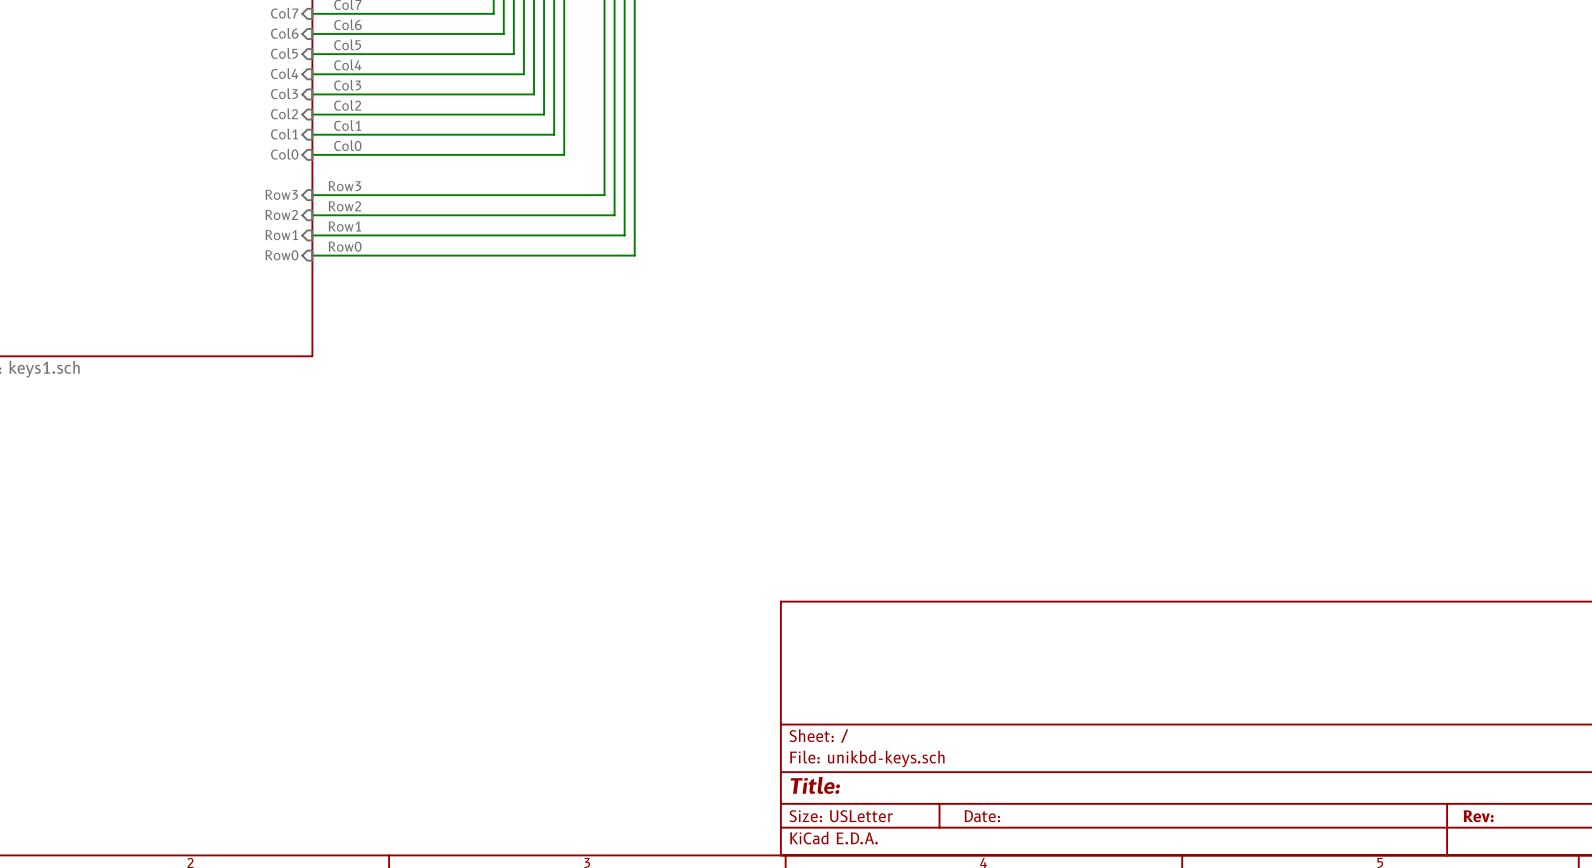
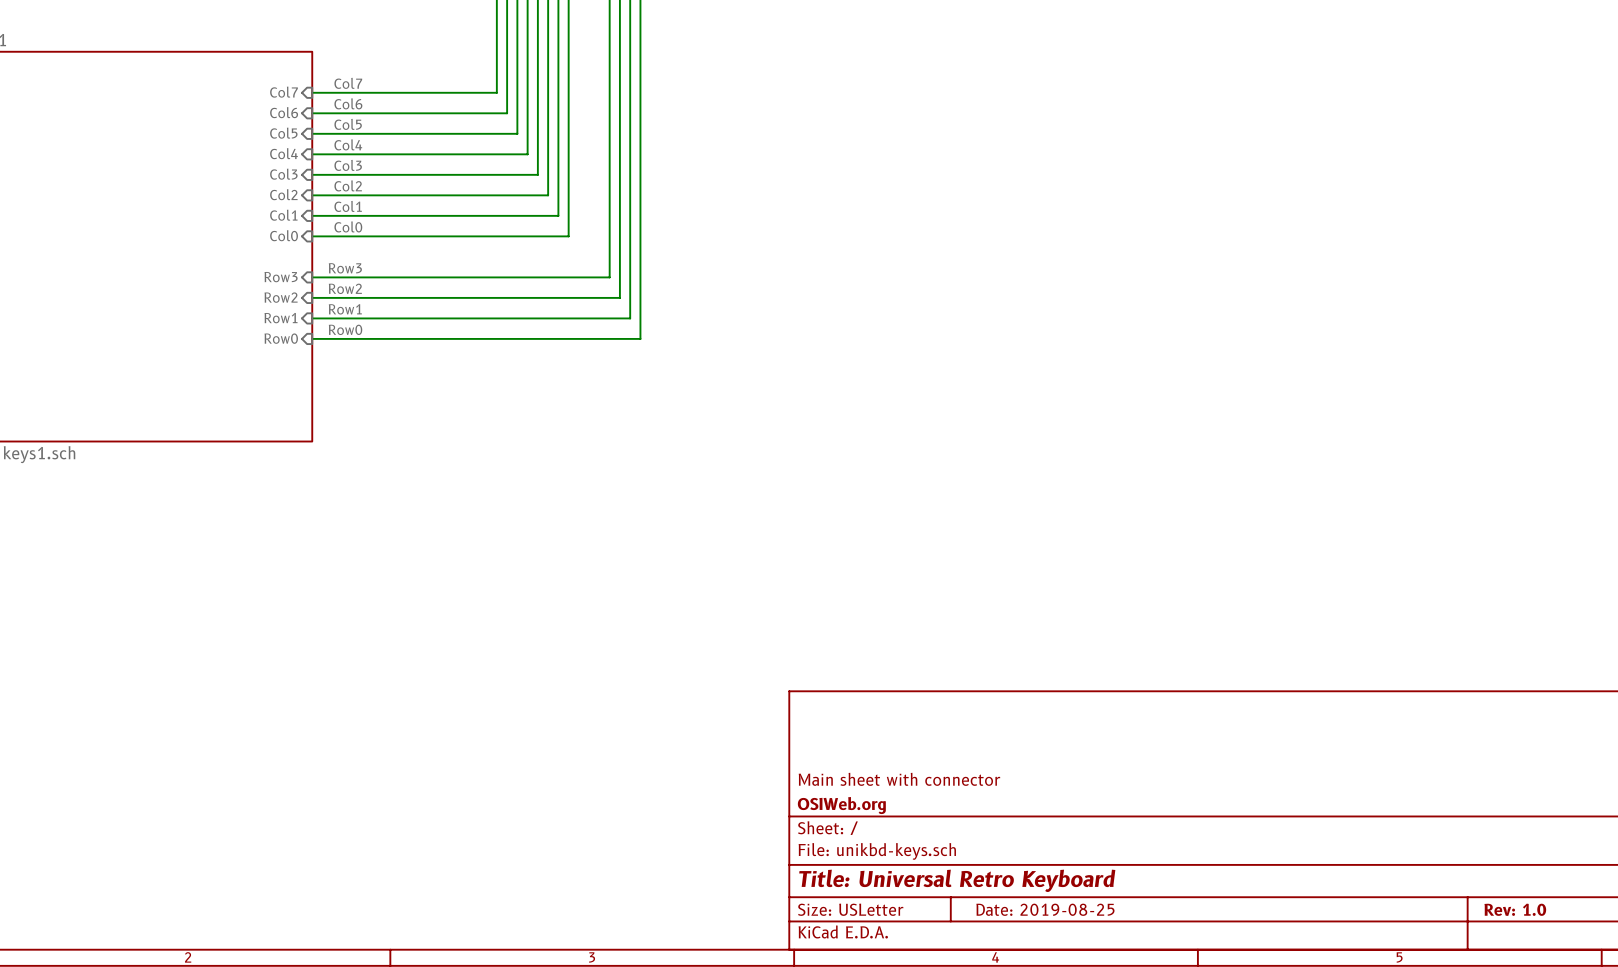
title block: none -> Main sheet with connector (899, 779)
title block: none -> OSIWeb.org (841, 805)
title block: Title: (815, 785) -> Title: Universal Retro Keyboard (957, 880)
title block: Date: (982, 816) -> Date: 2019-08-25 (1045, 909)
title block: Rev: (1478, 816) -> Rev: 1.0 (1515, 909)

